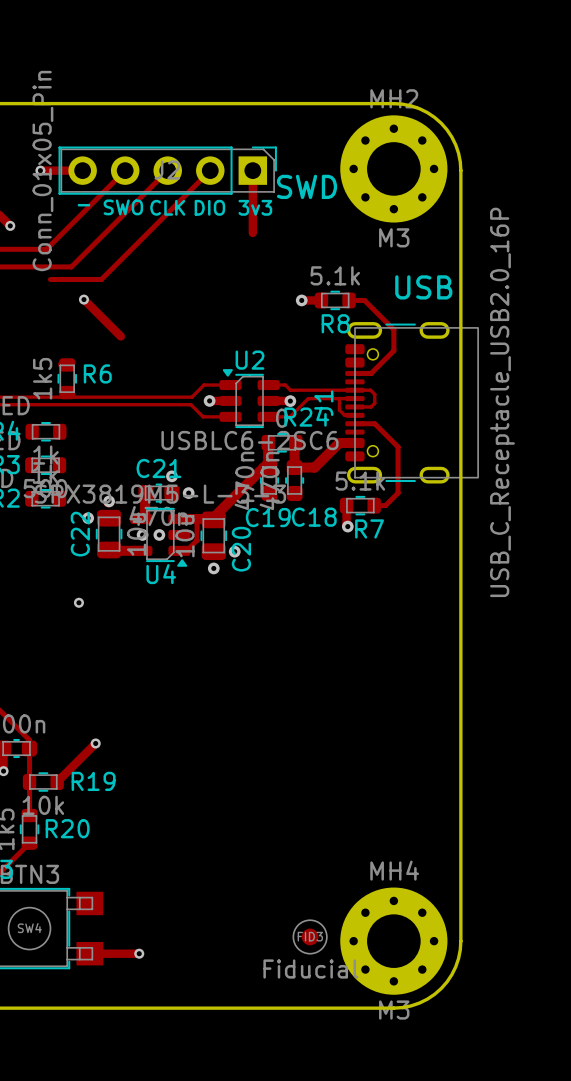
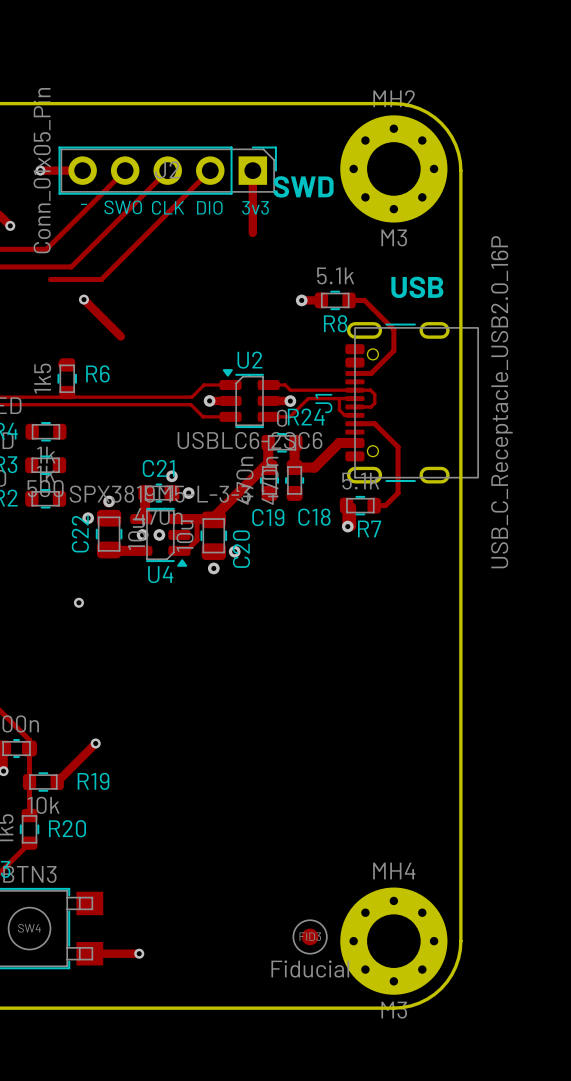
track: none -> (351, 506) (351, 526)

